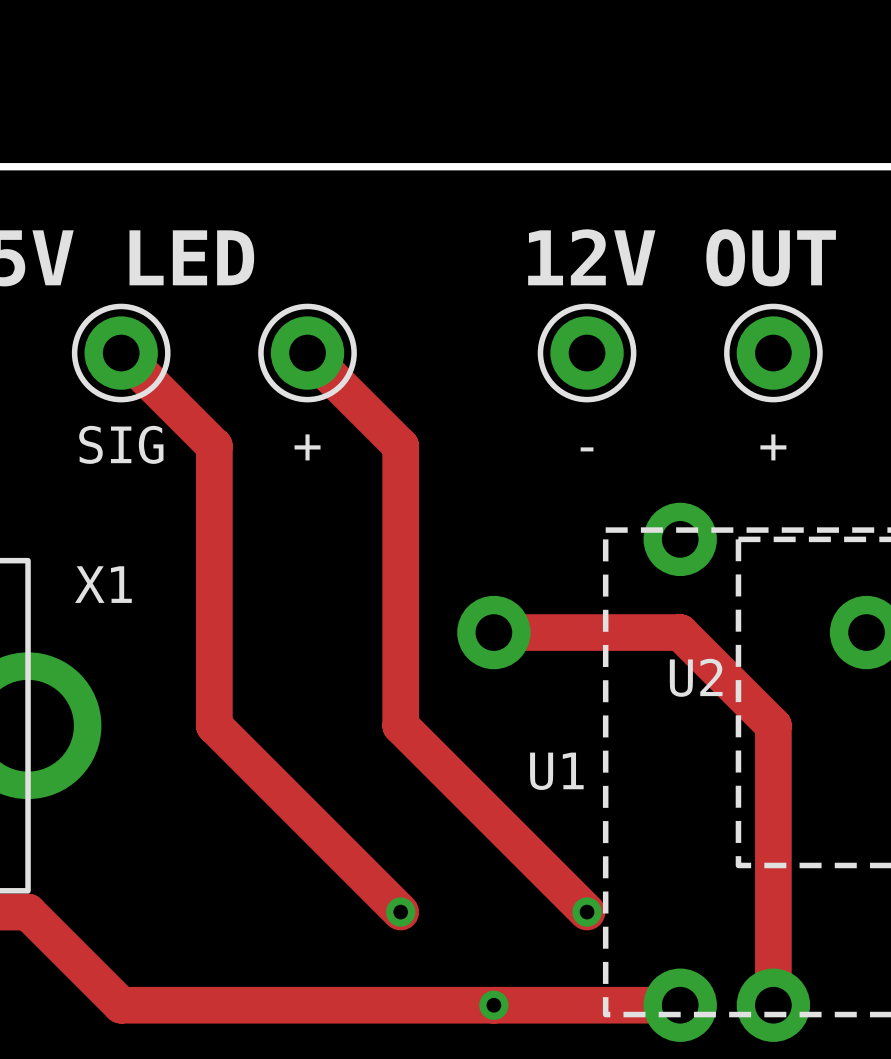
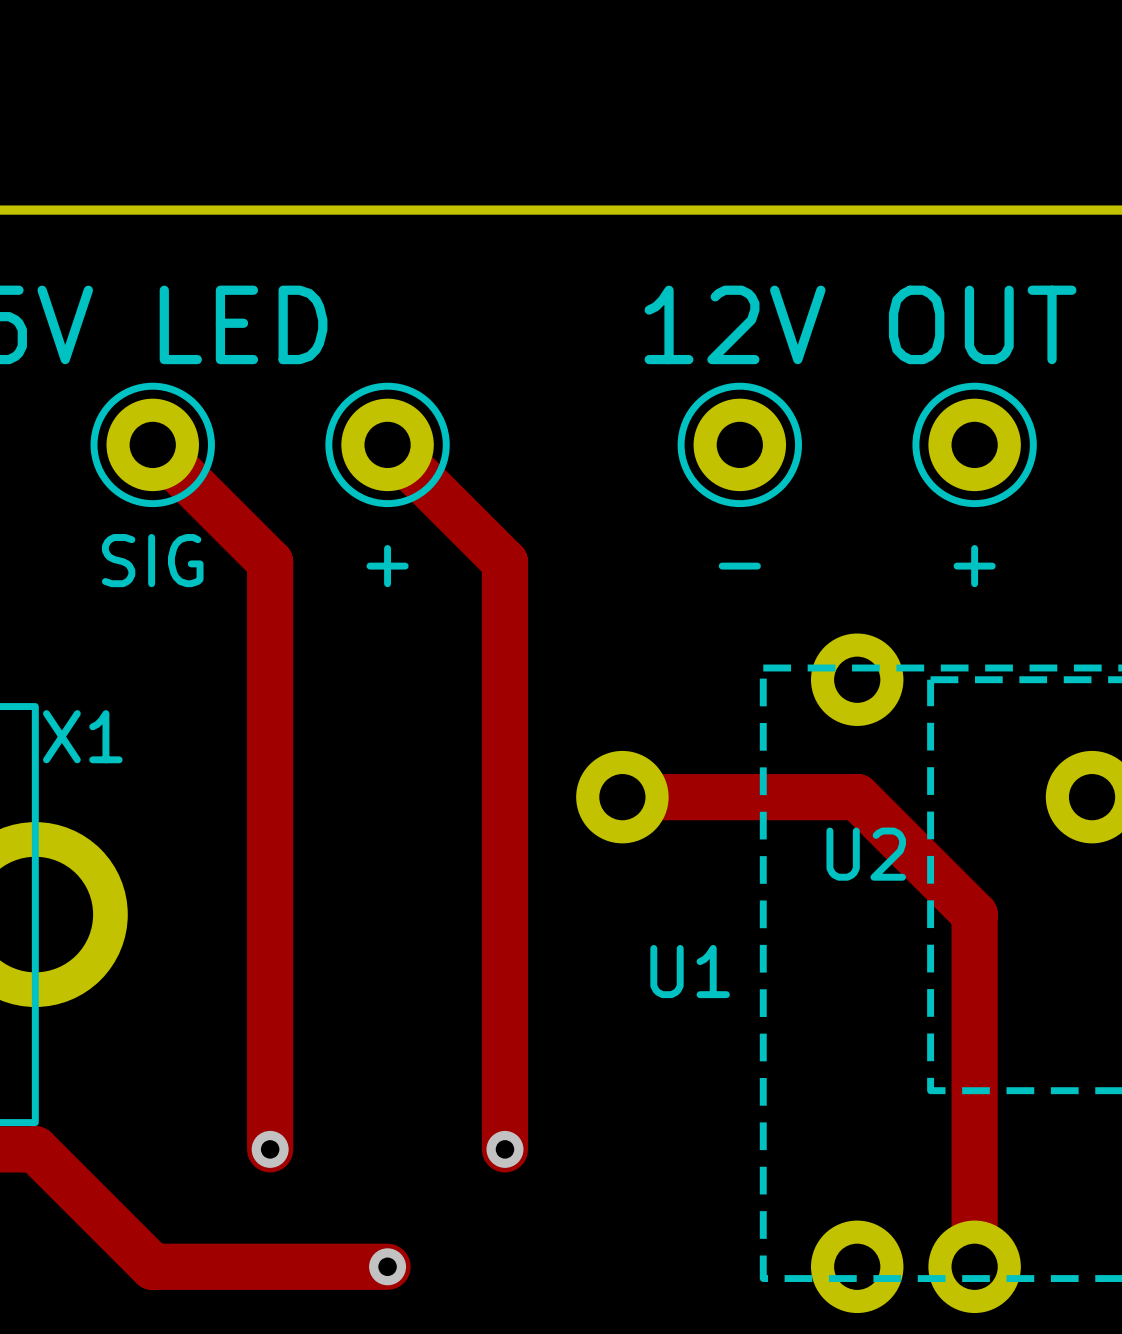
X1 name position: X1 (103, 584) -> X1 (82, 736)
track: (214, 725) (400, 912) -> (270, 914) (270, 1149)
track: (400, 725) (587, 912) -> (504, 914) (504, 1149)
via: none -> (270, 1149)
via: (587, 912) -> none
track: (307, 1005) (680, 1005) -> none
via: none -> (387, 1266)
via: (493, 1005) -> none

